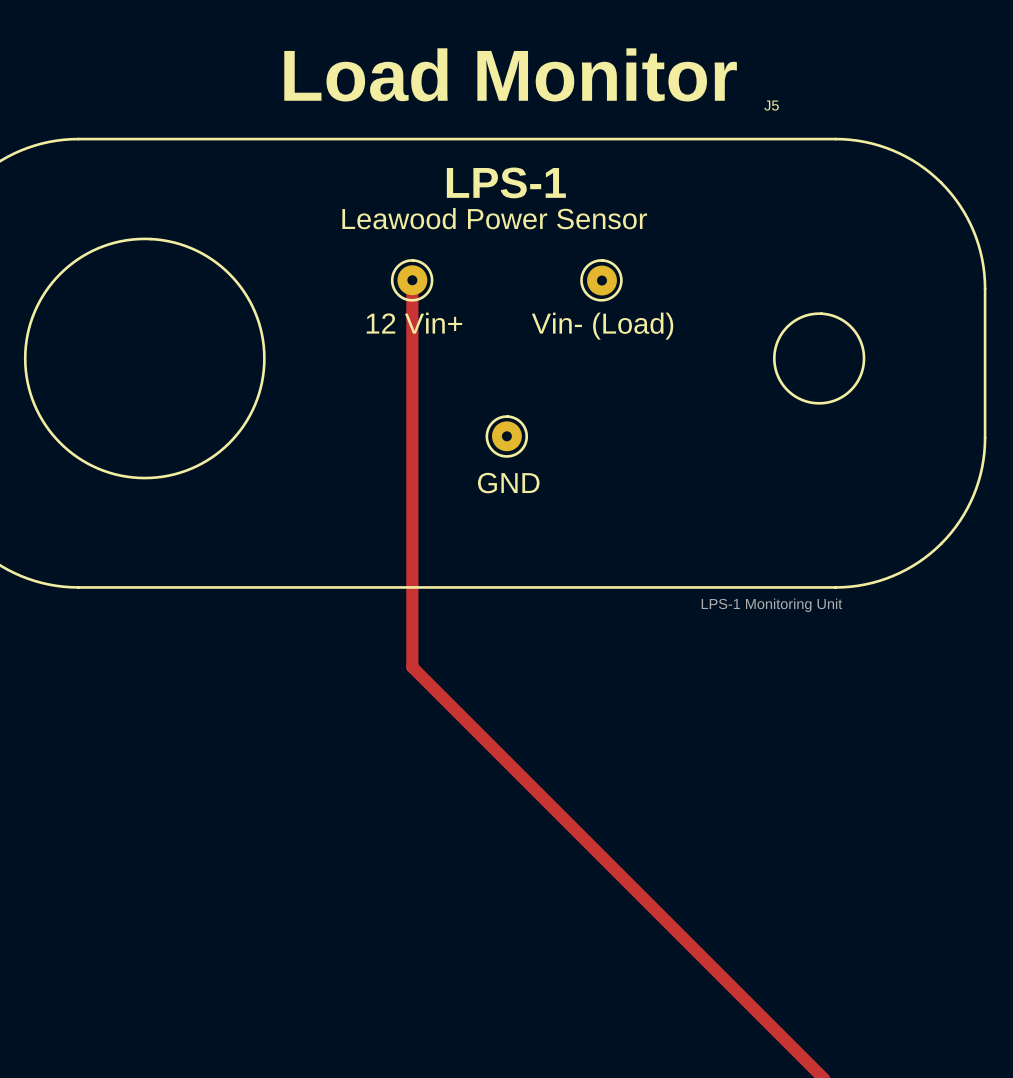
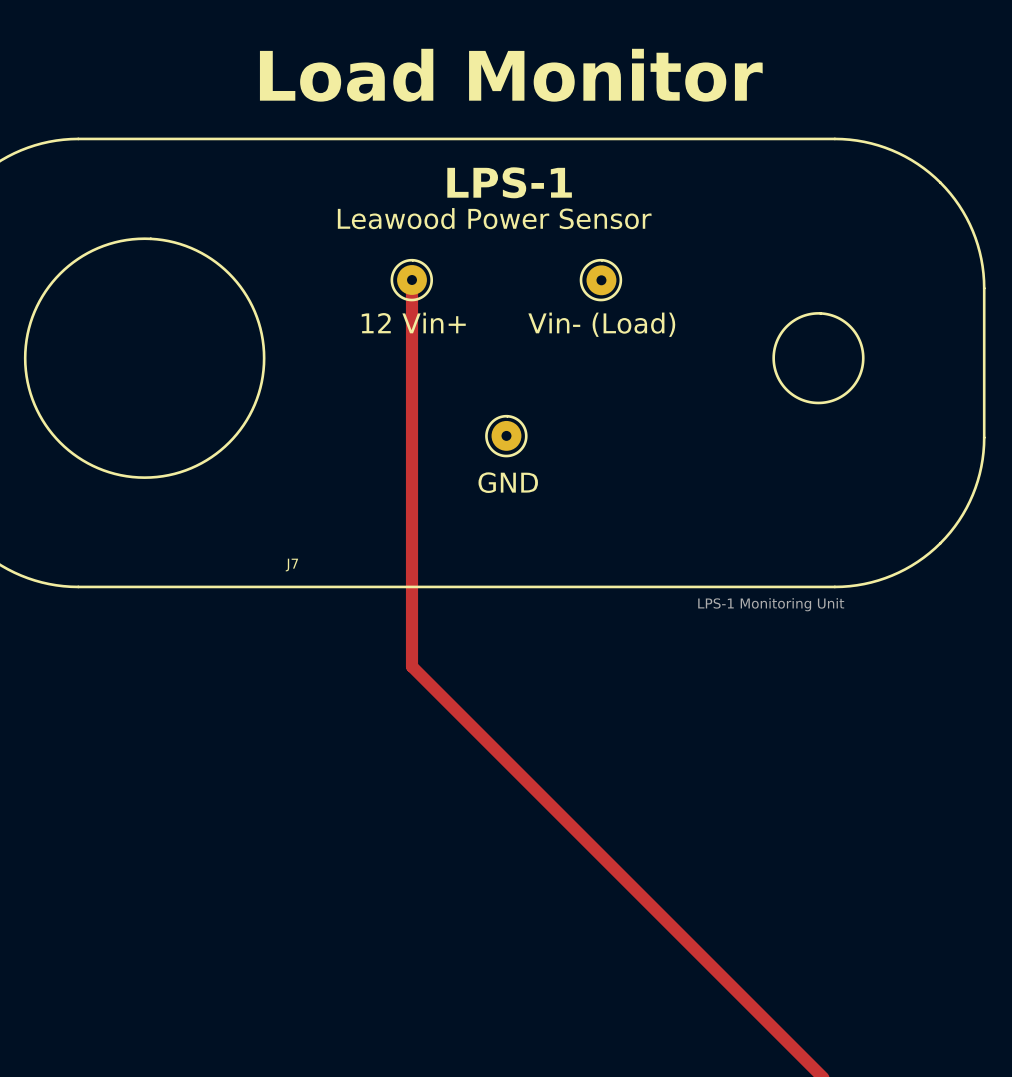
J5 name: J5 (771, 105) -> J7 (291, 565)

